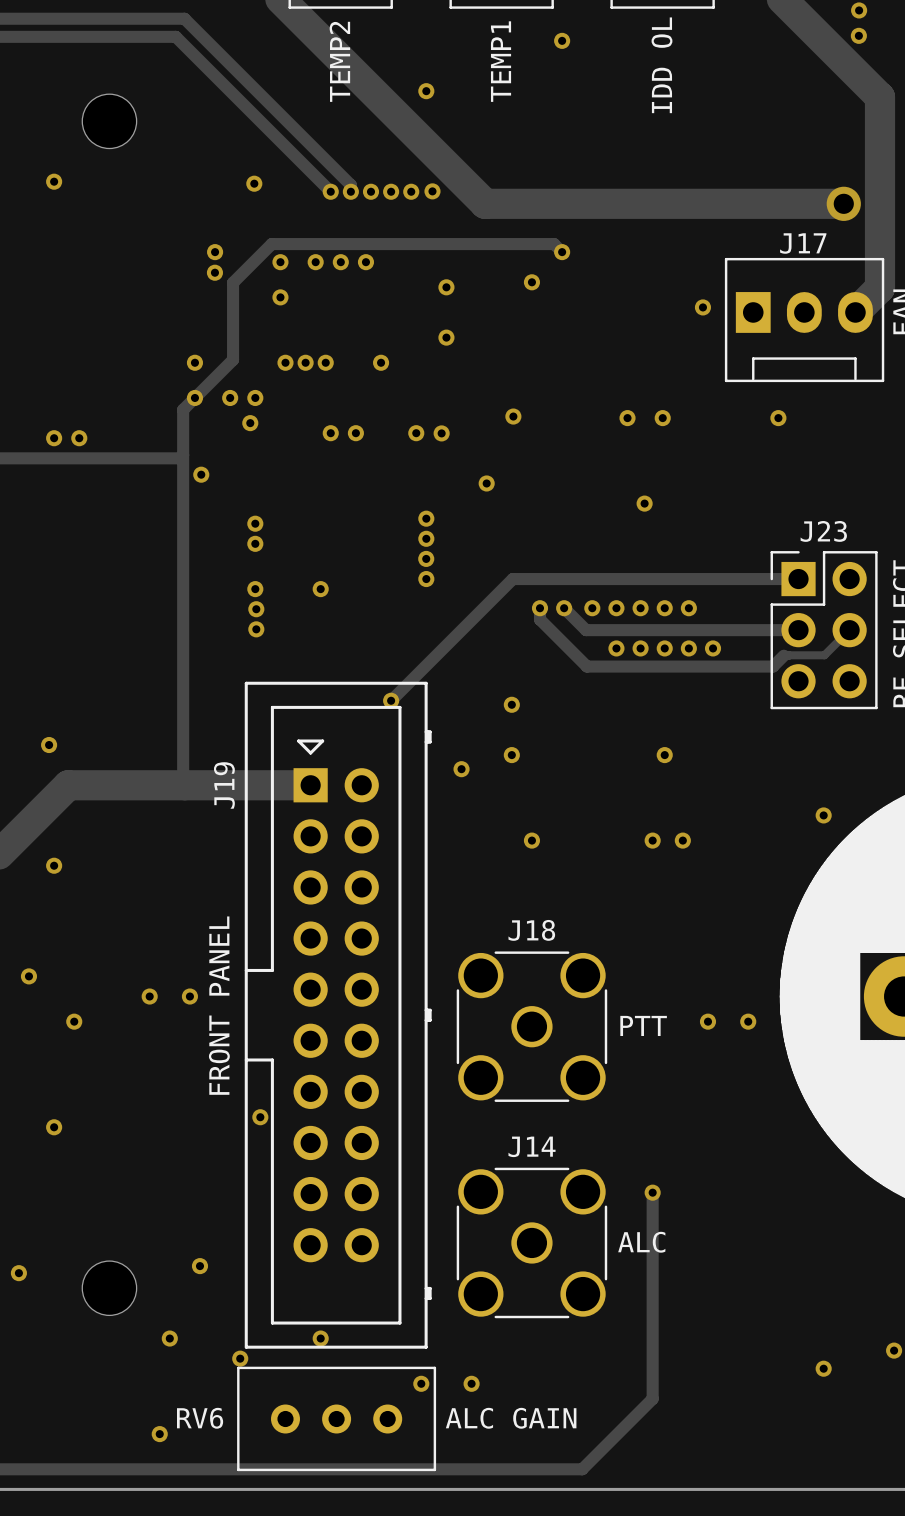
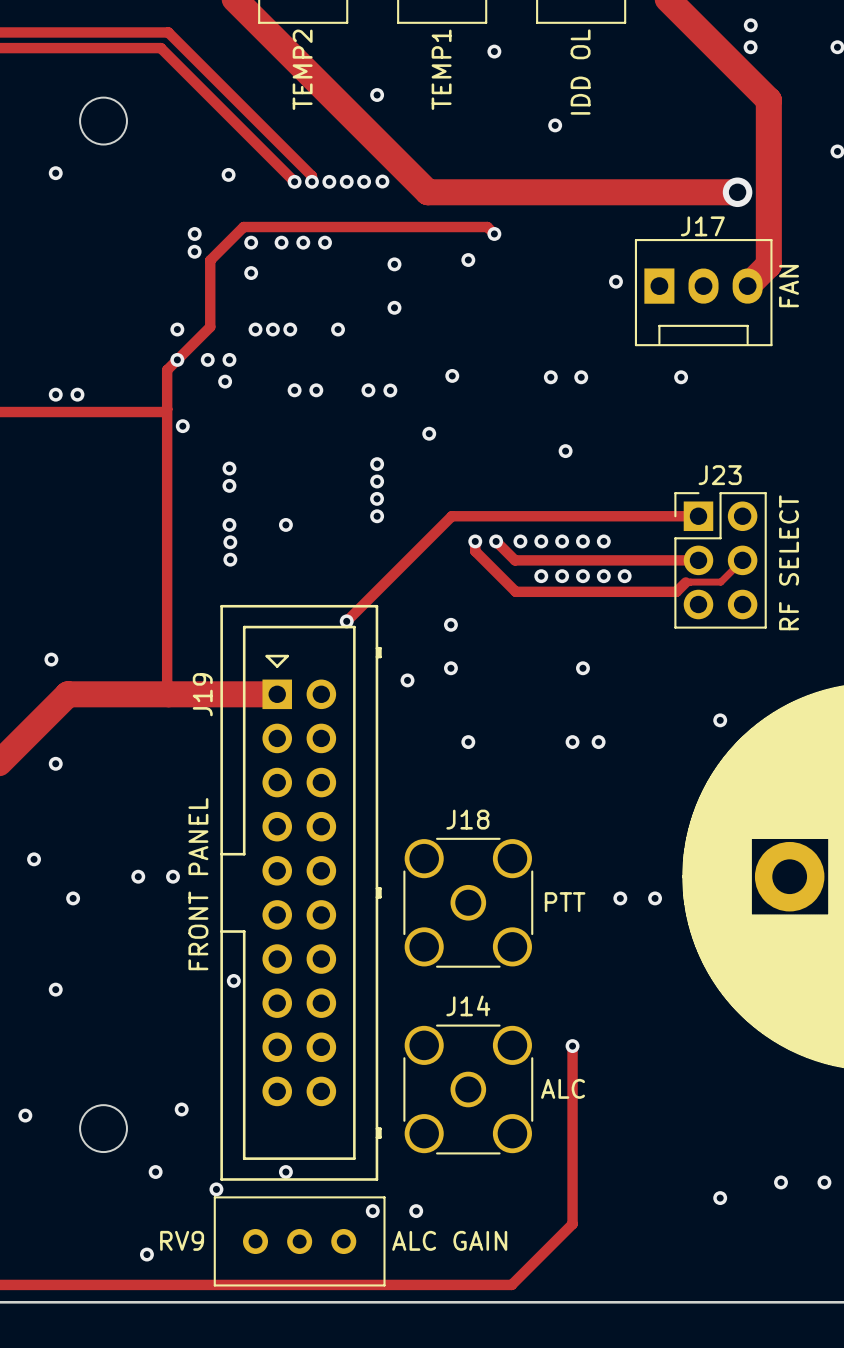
via: none -> (555, 125)
RV6 name: RV6 (200, 1418) -> RV9 (182, 1240)

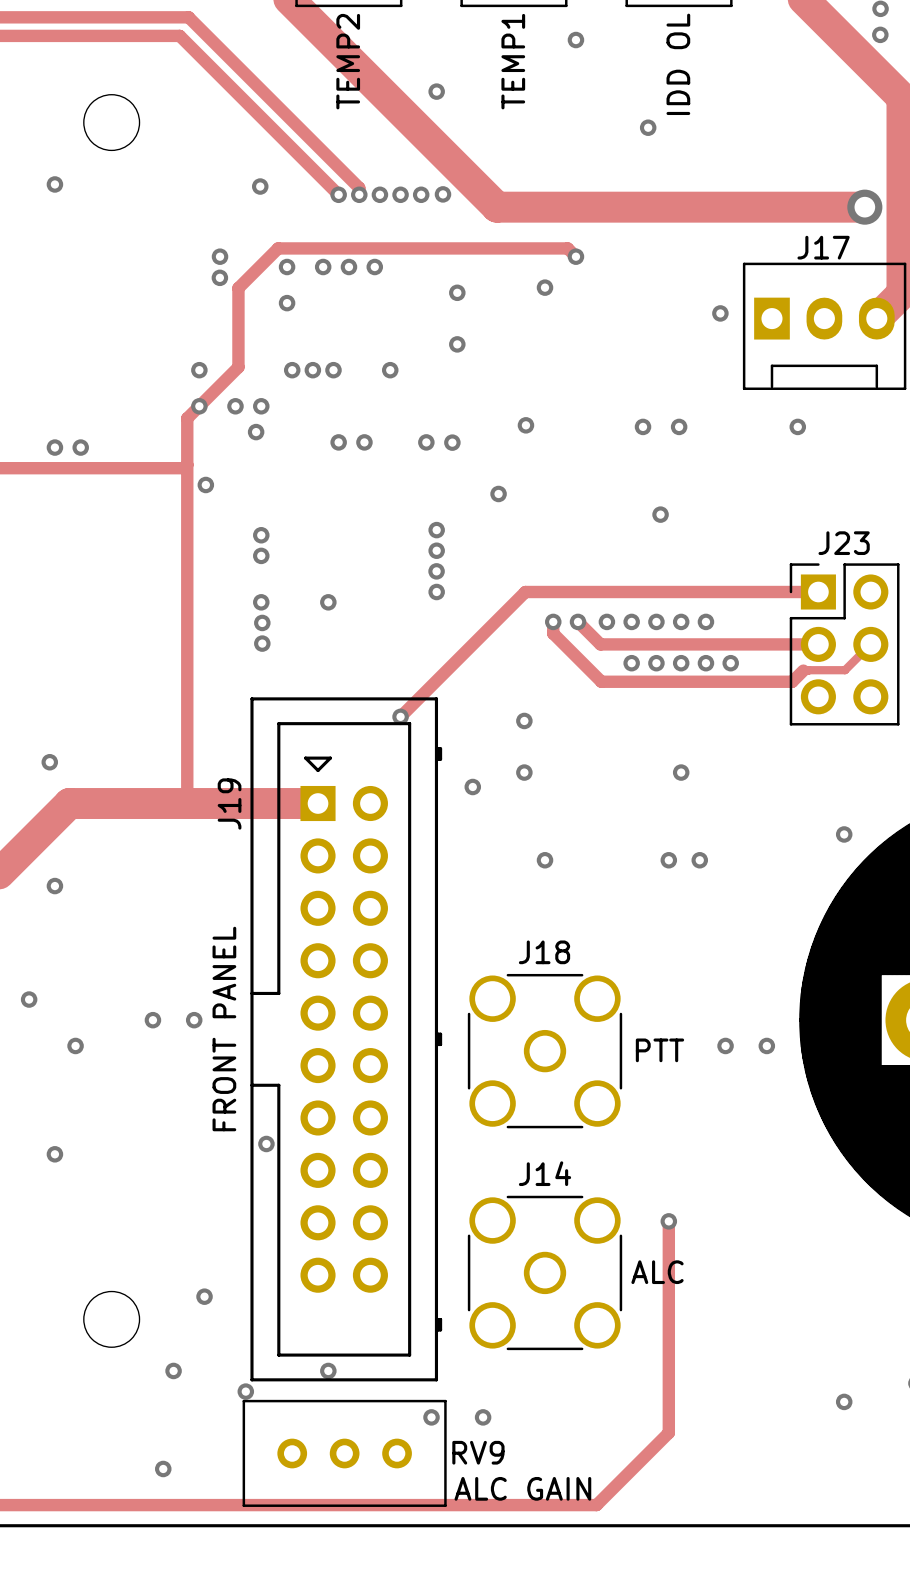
via: (25, 1115) -> none
RV9 name position: RV9 (182, 1240) -> RV9 (478, 1452)
text position: ALC GAIN (449, 1240) -> ALC GAIN (522, 1488)

